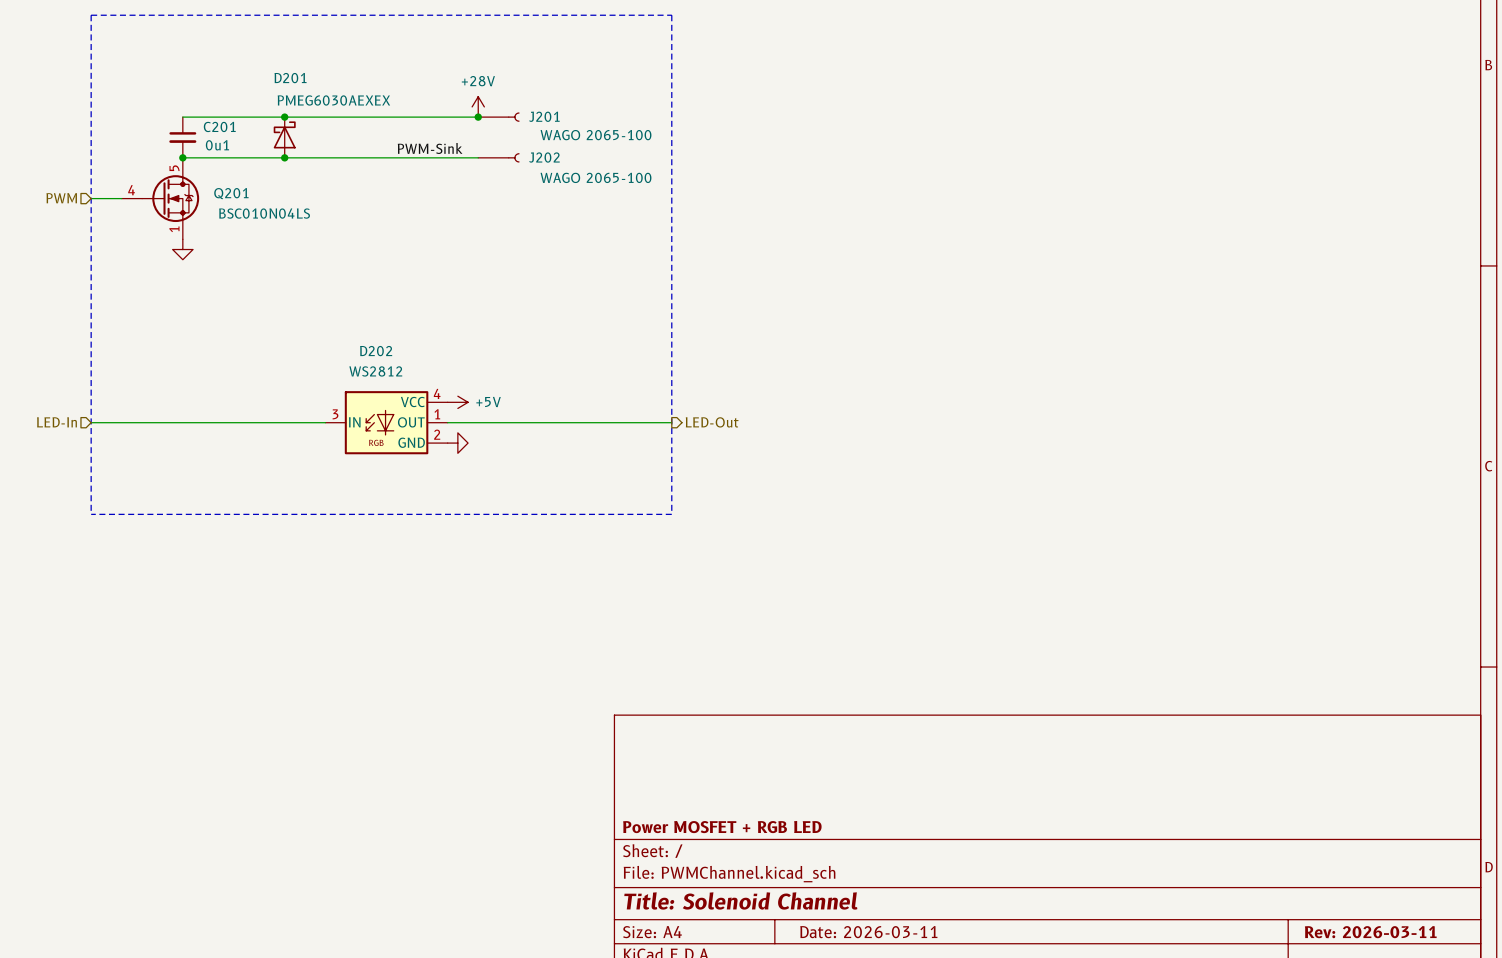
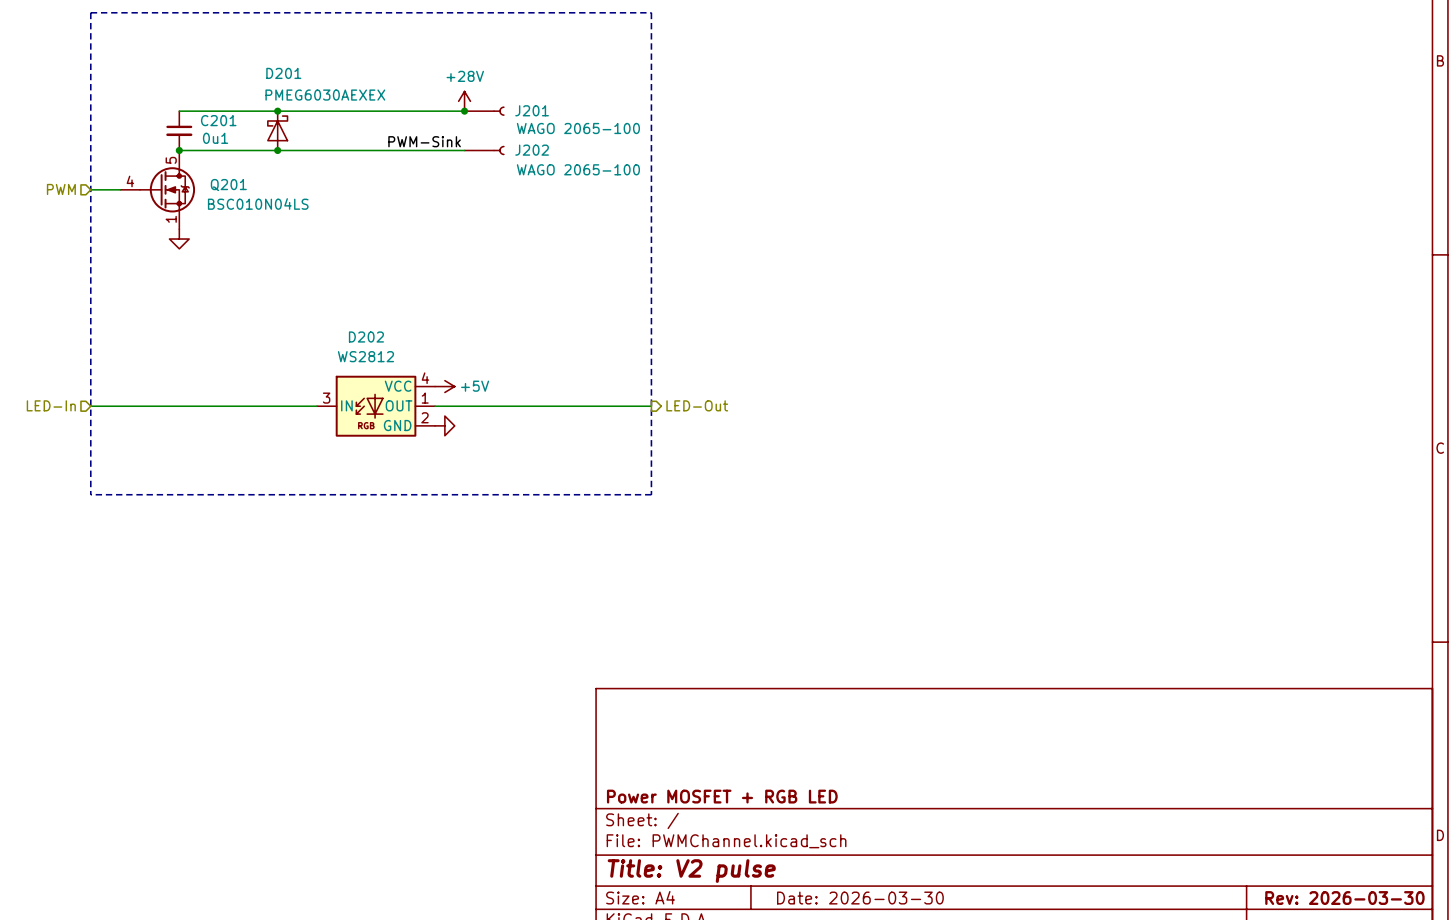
title block: Title: Solenoid Channel (740, 900) -> Title: V2 pulse (691, 871)
title block: Date: 2026-03-11 (868, 932) -> Date: 2026-03-30 (860, 898)
title block: Rev: 2026-03-11 (1370, 932) -> Rev: 2026-03-30 (1344, 898)

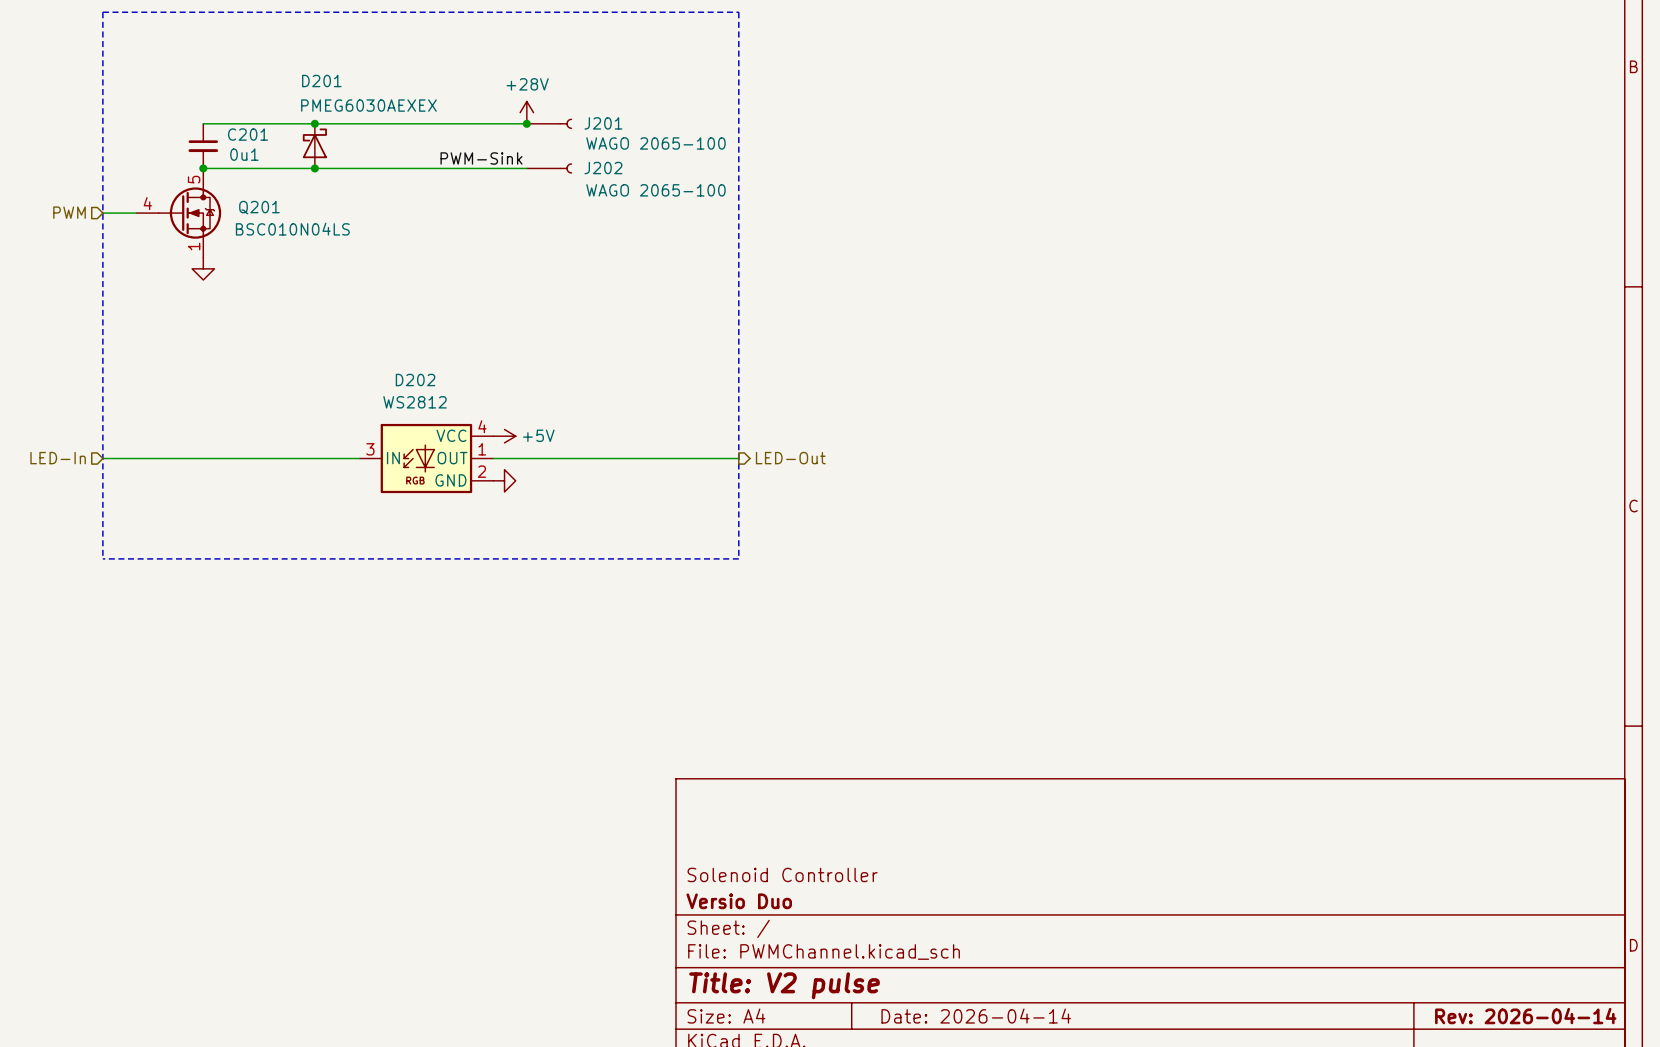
title block: none -> Solenoid Controller (782, 874)
title block: Power MOSFET + RGB LED (722, 796) -> Versio Duo (739, 901)
title block: Date: 2026-03-30 (860, 898) -> Date: 2026-04-14 (976, 1016)
title block: Rev: 2026-03-30 (1344, 898) -> Rev: 2026-04-14 (1525, 1016)

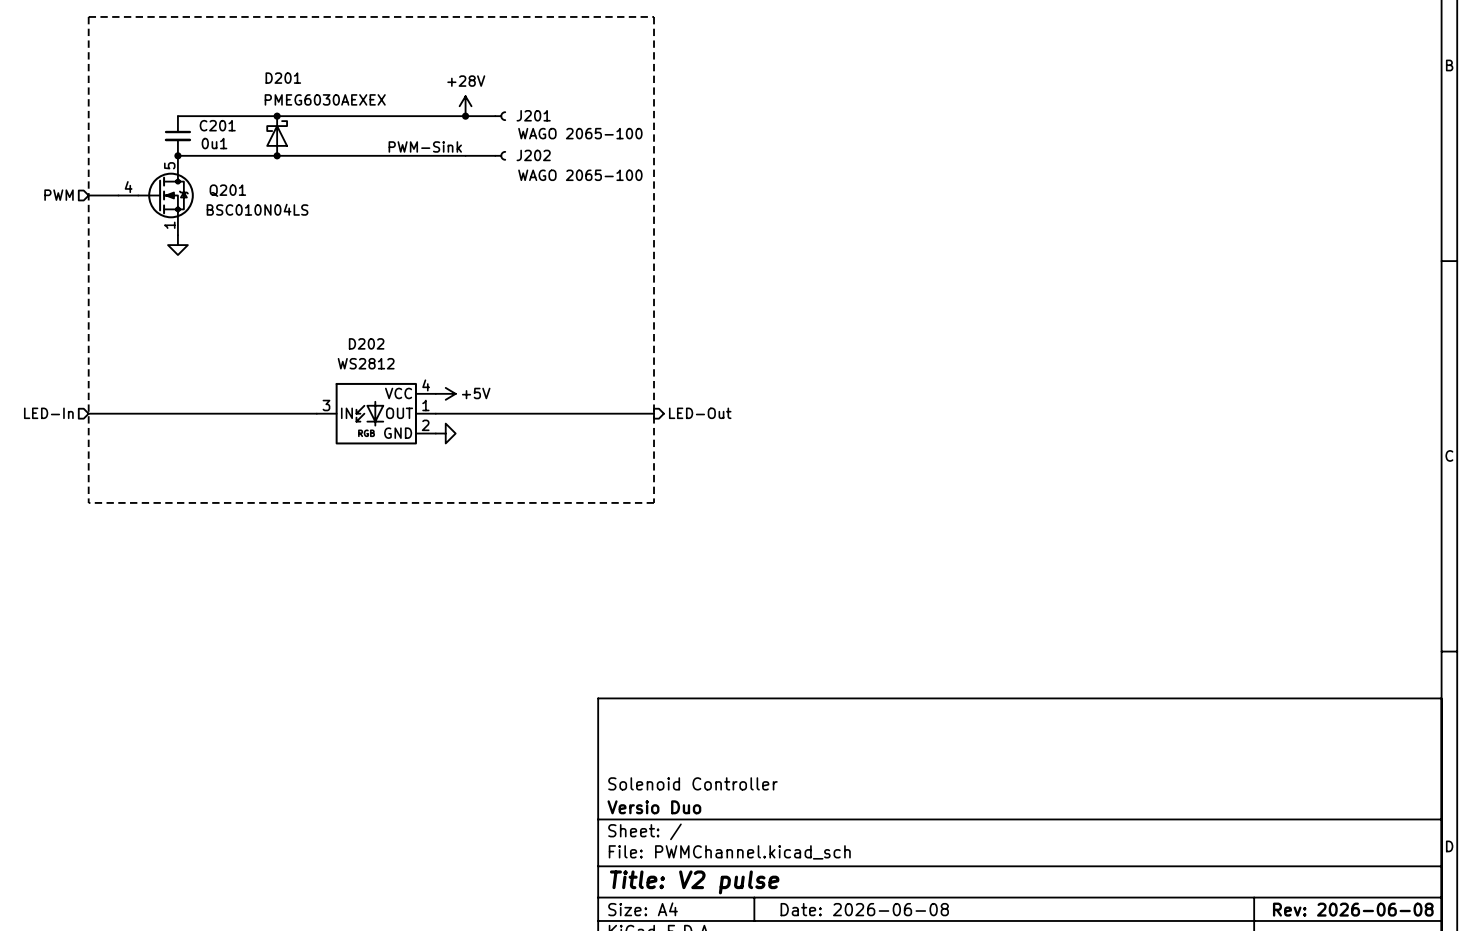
title block: Date: 2026-04-14 (976, 1016) -> Date: 2026-06-08 (864, 909)
title block: Rev: 2026-04-14 (1525, 1016) -> Rev: 2026-06-08 (1353, 909)

